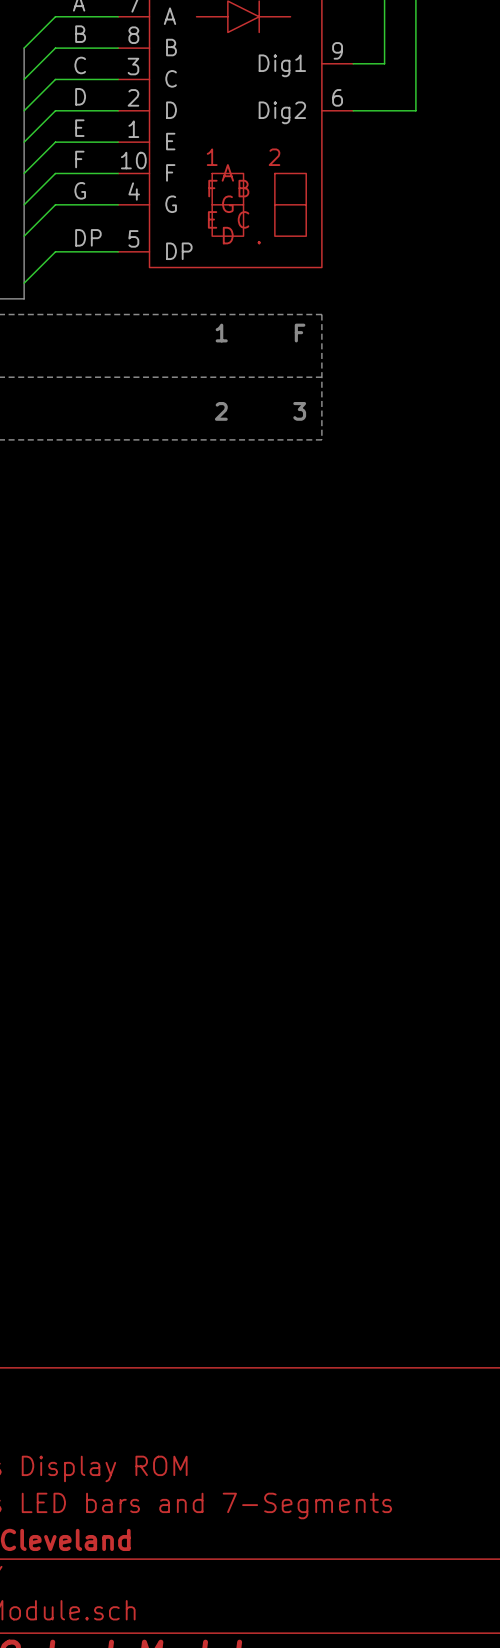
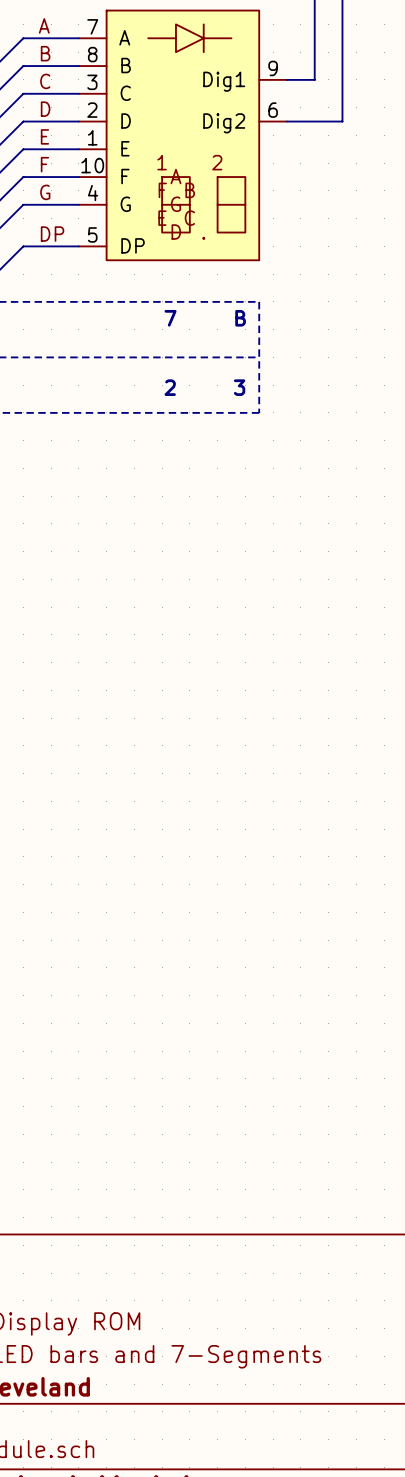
text: 1 (221, 333) -> 7 (170, 318)
text: F (300, 333) -> B (240, 318)

